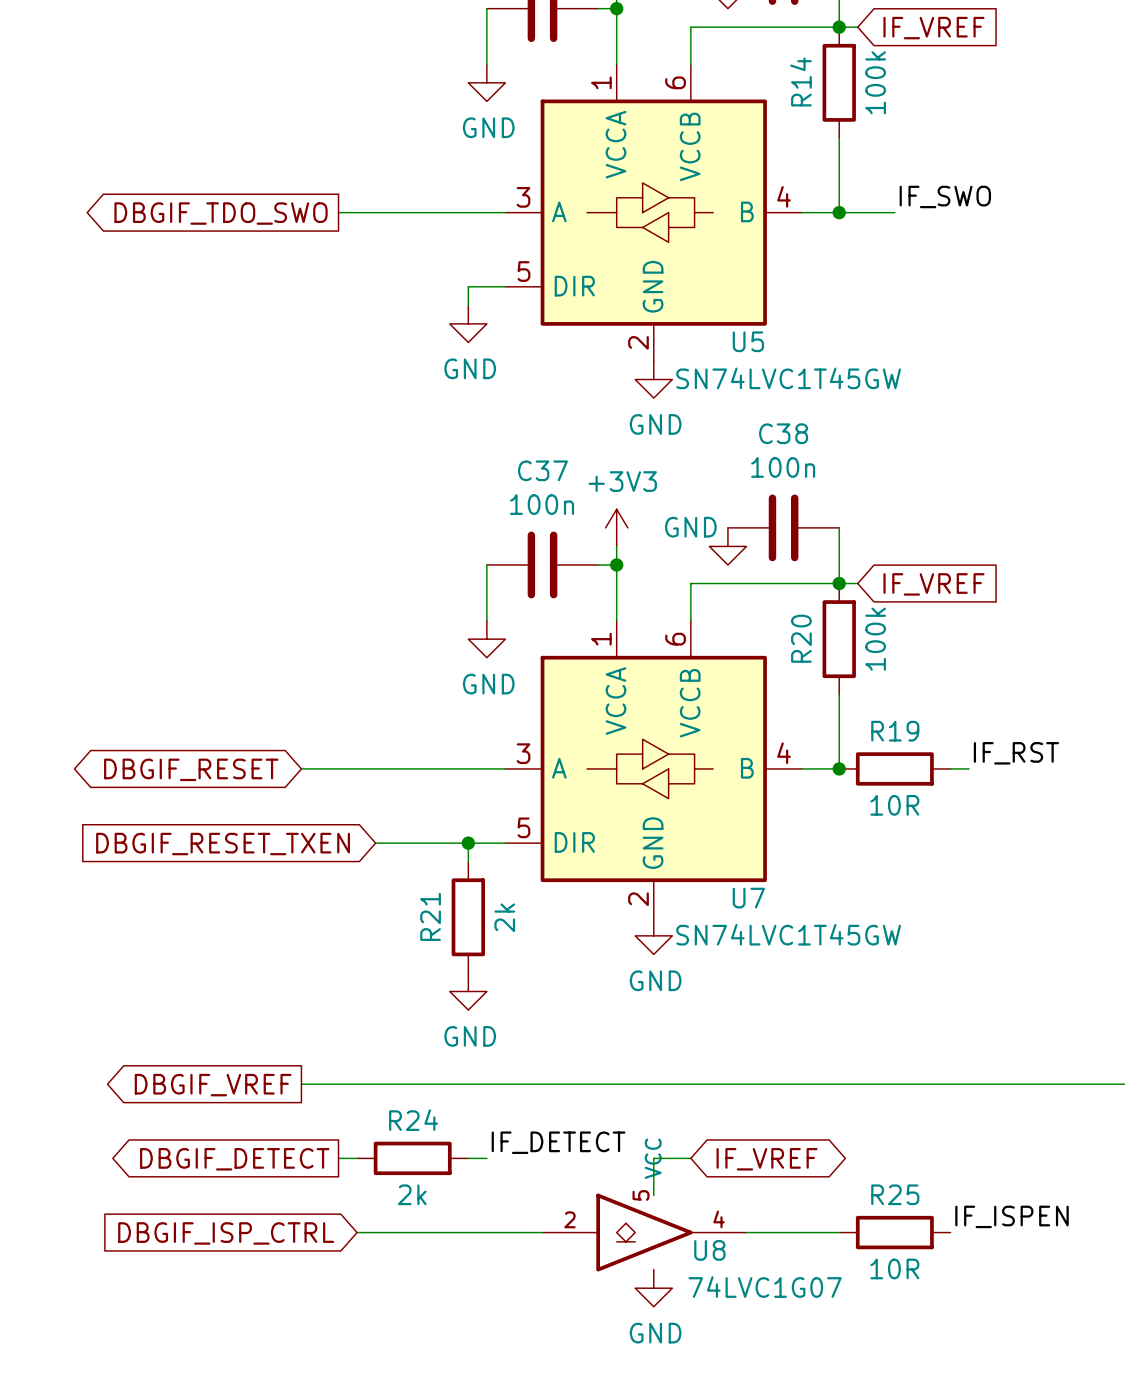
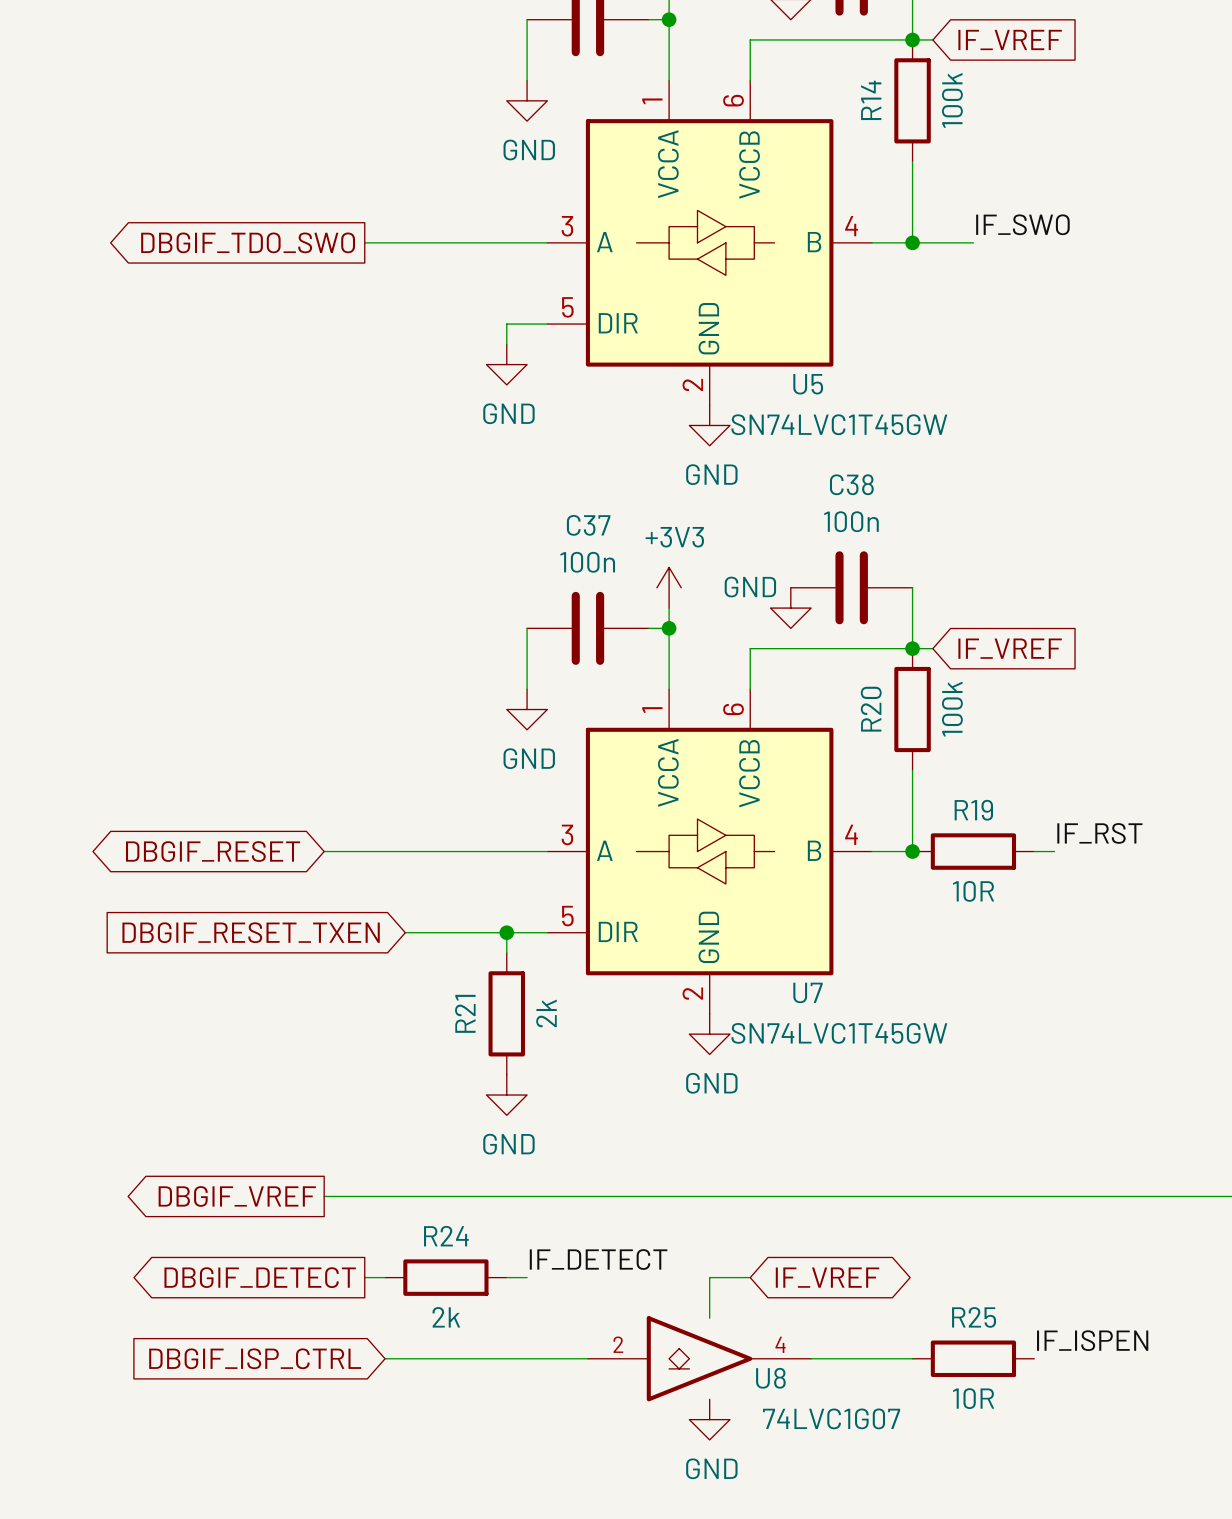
U8 pin name: VCC (653, 1158) -> none
U8 pin number: 5 (641, 1195) -> none

